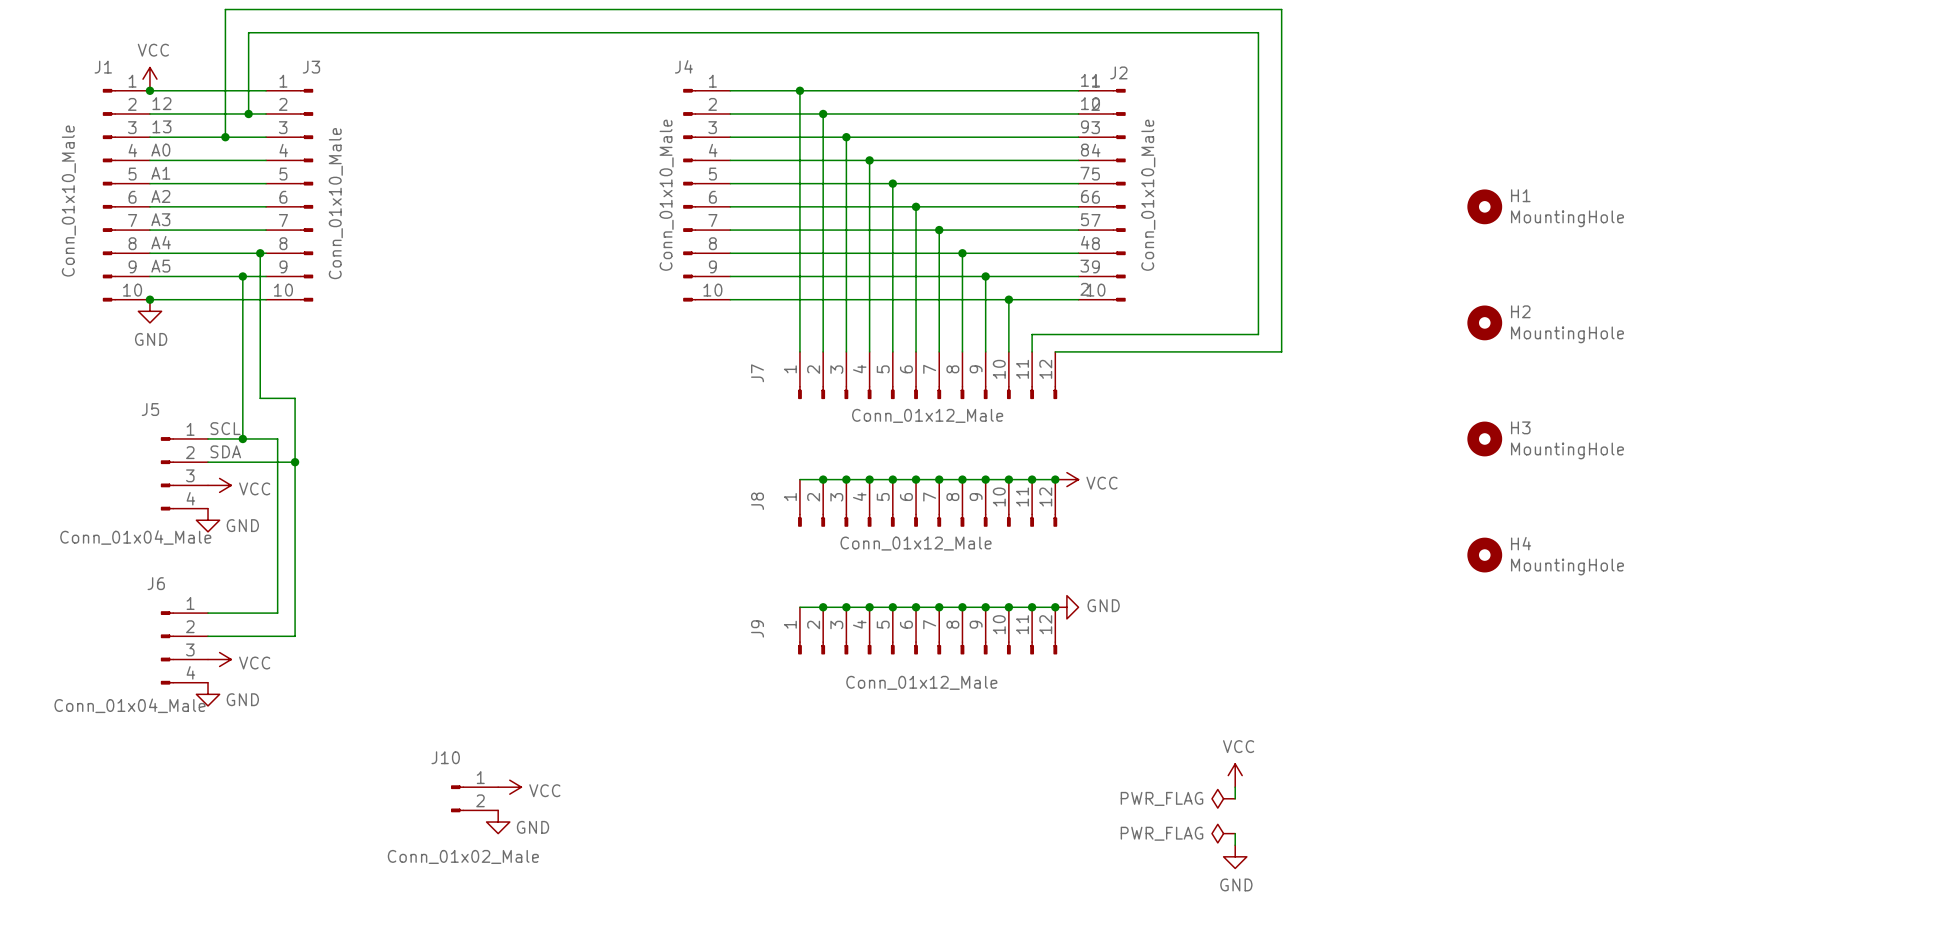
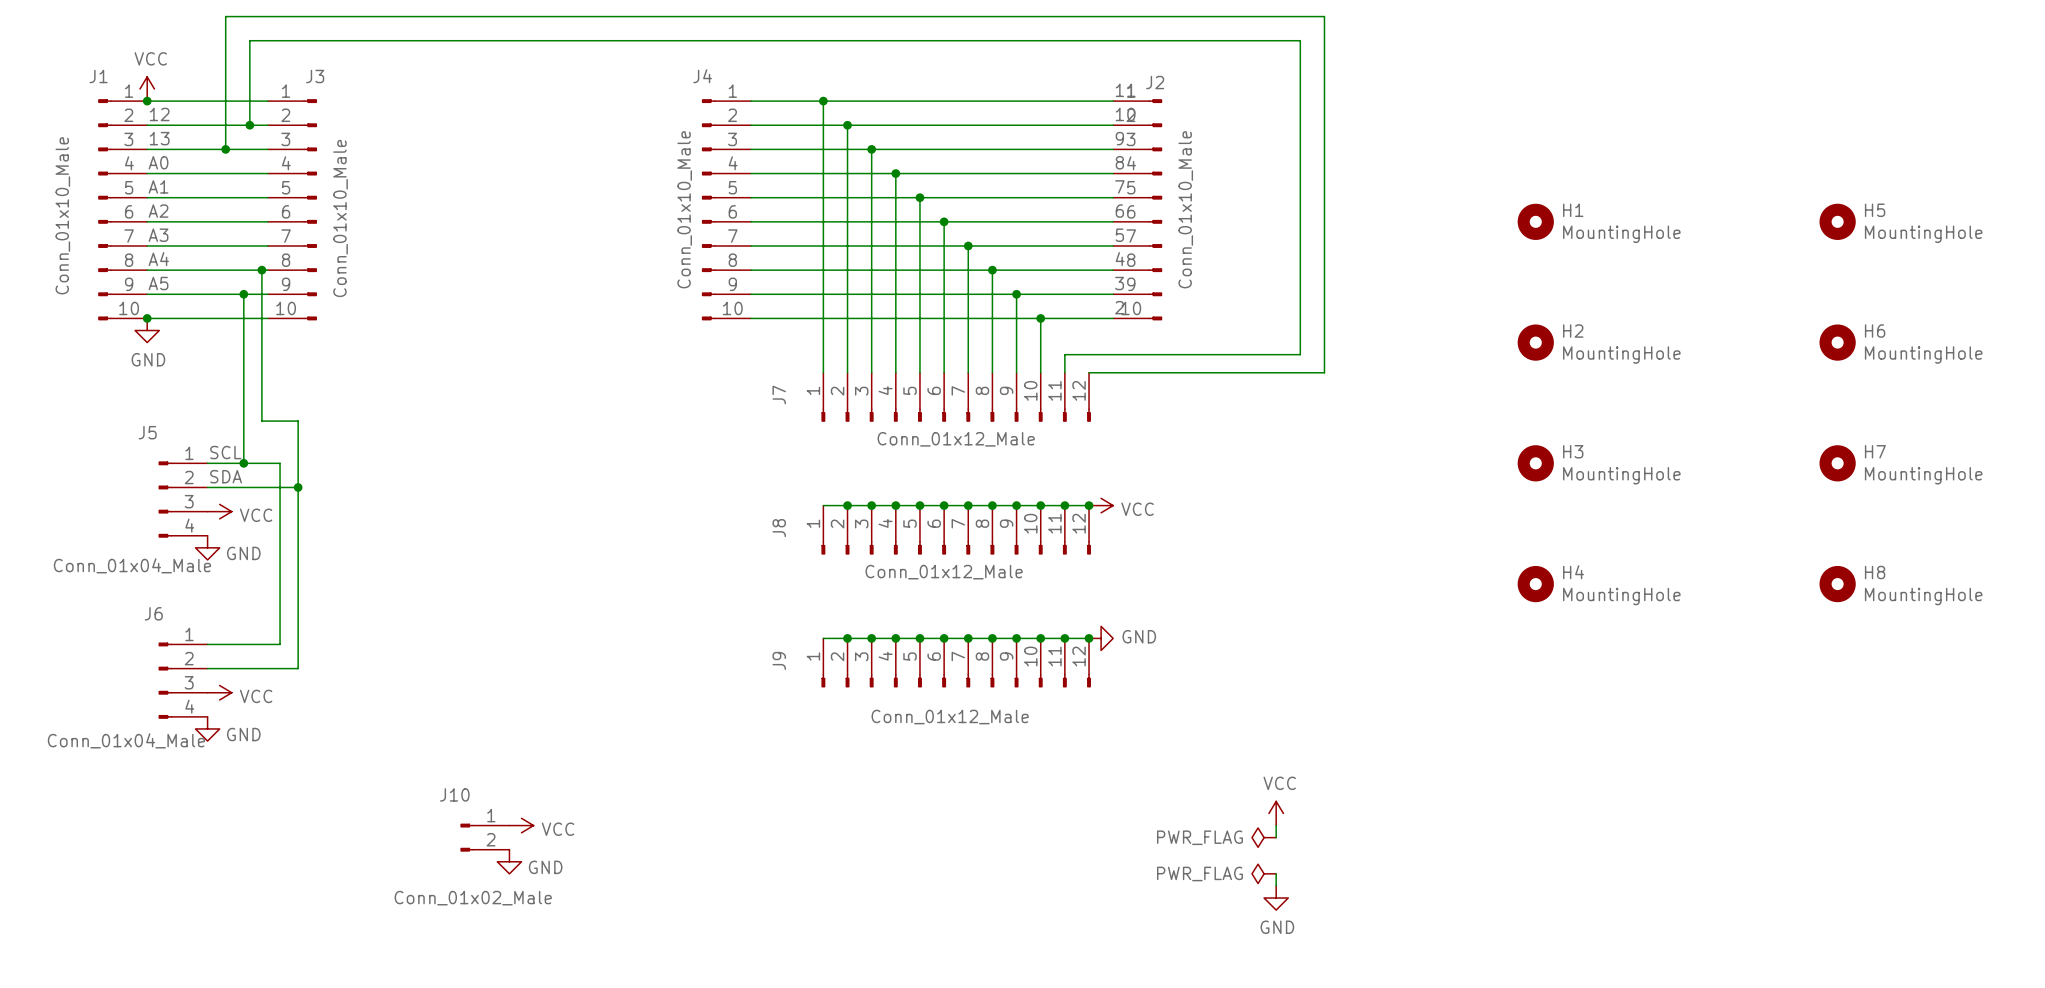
H5: none -> MountingHole (1837, 221)
H6: none -> MountingHole (1837, 342)
H7: none -> MountingHole (1837, 463)
H8: none -> MountingHole (1837, 584)

